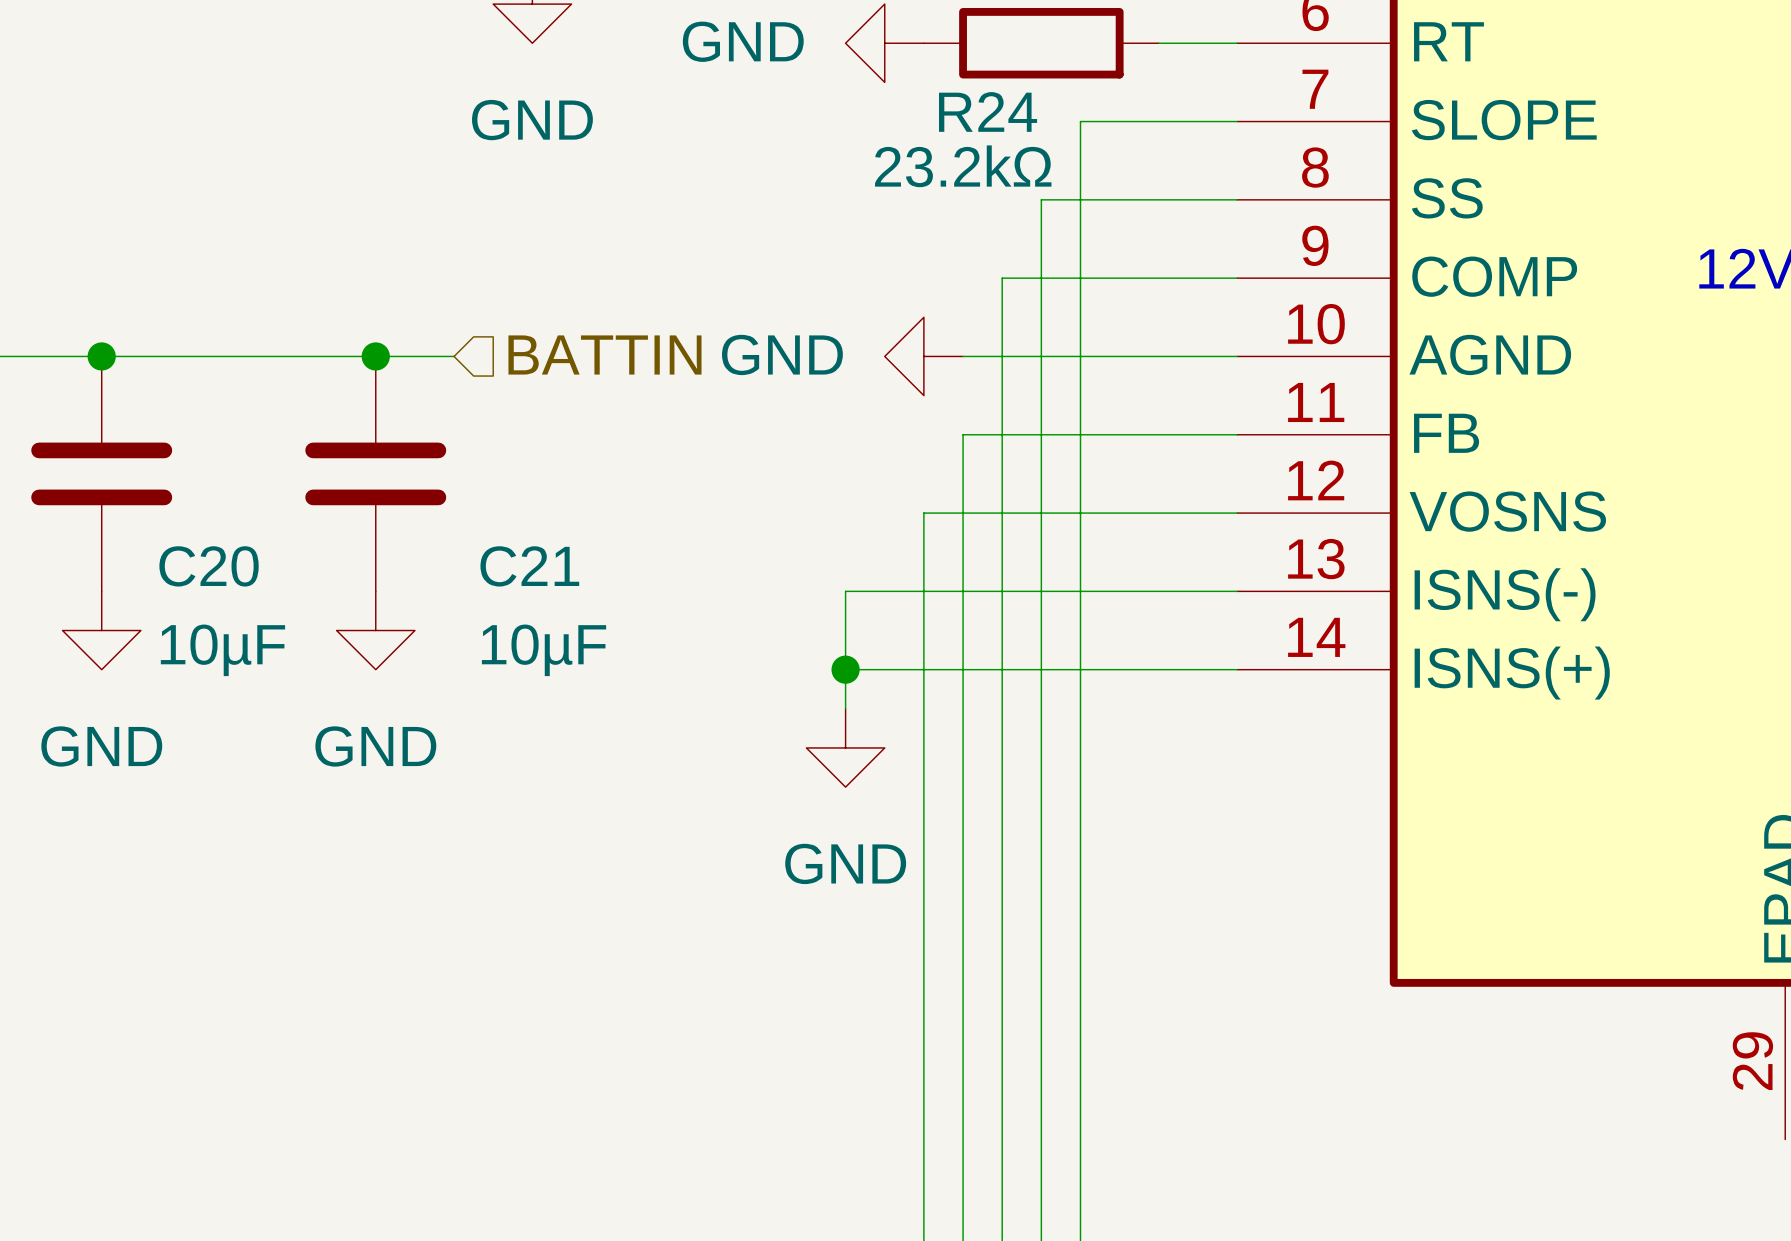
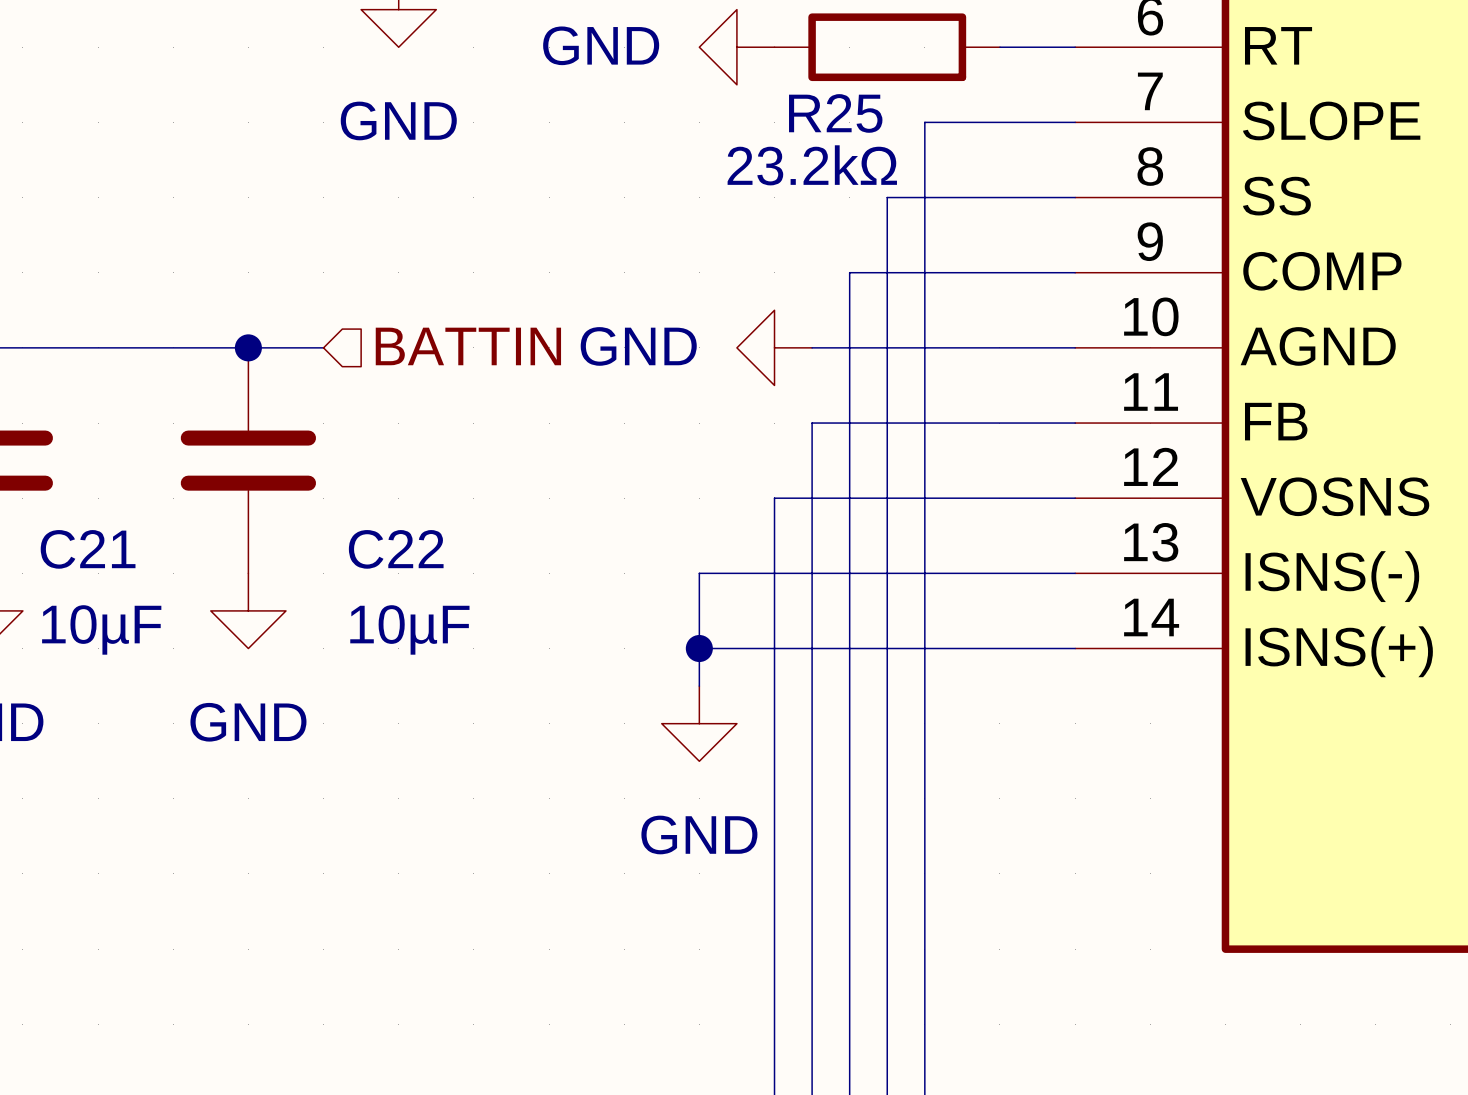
R24 name: R24 (988, 111) -> R25 (835, 113)
C20 name: C20 (209, 566) -> C21 (88, 549)
C21 name: C21 (529, 566) -> C22 (396, 549)

